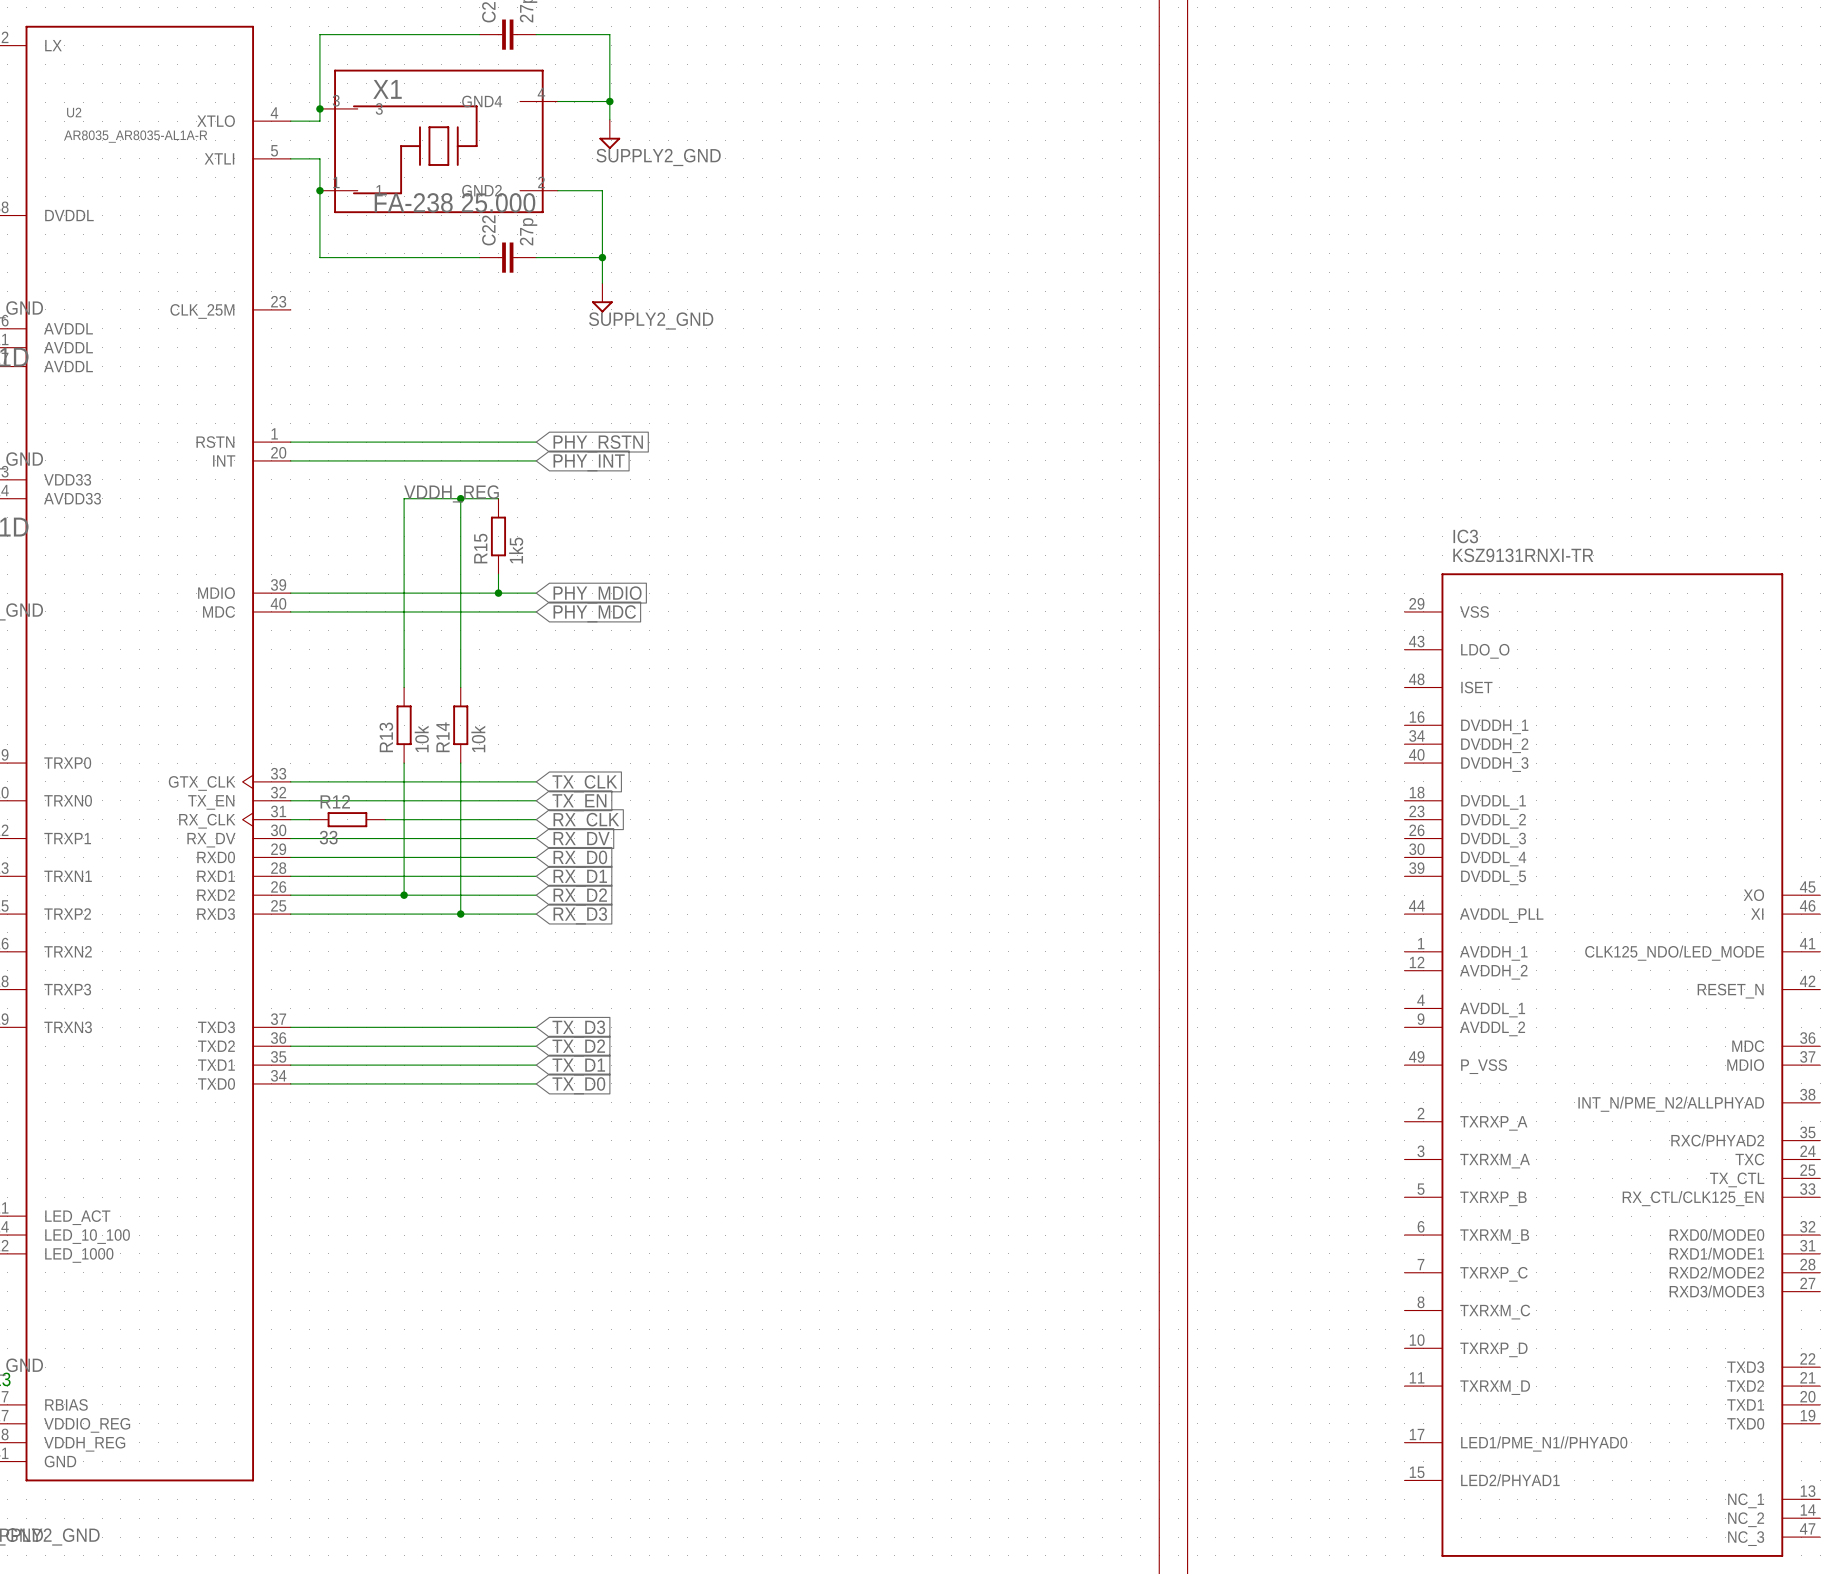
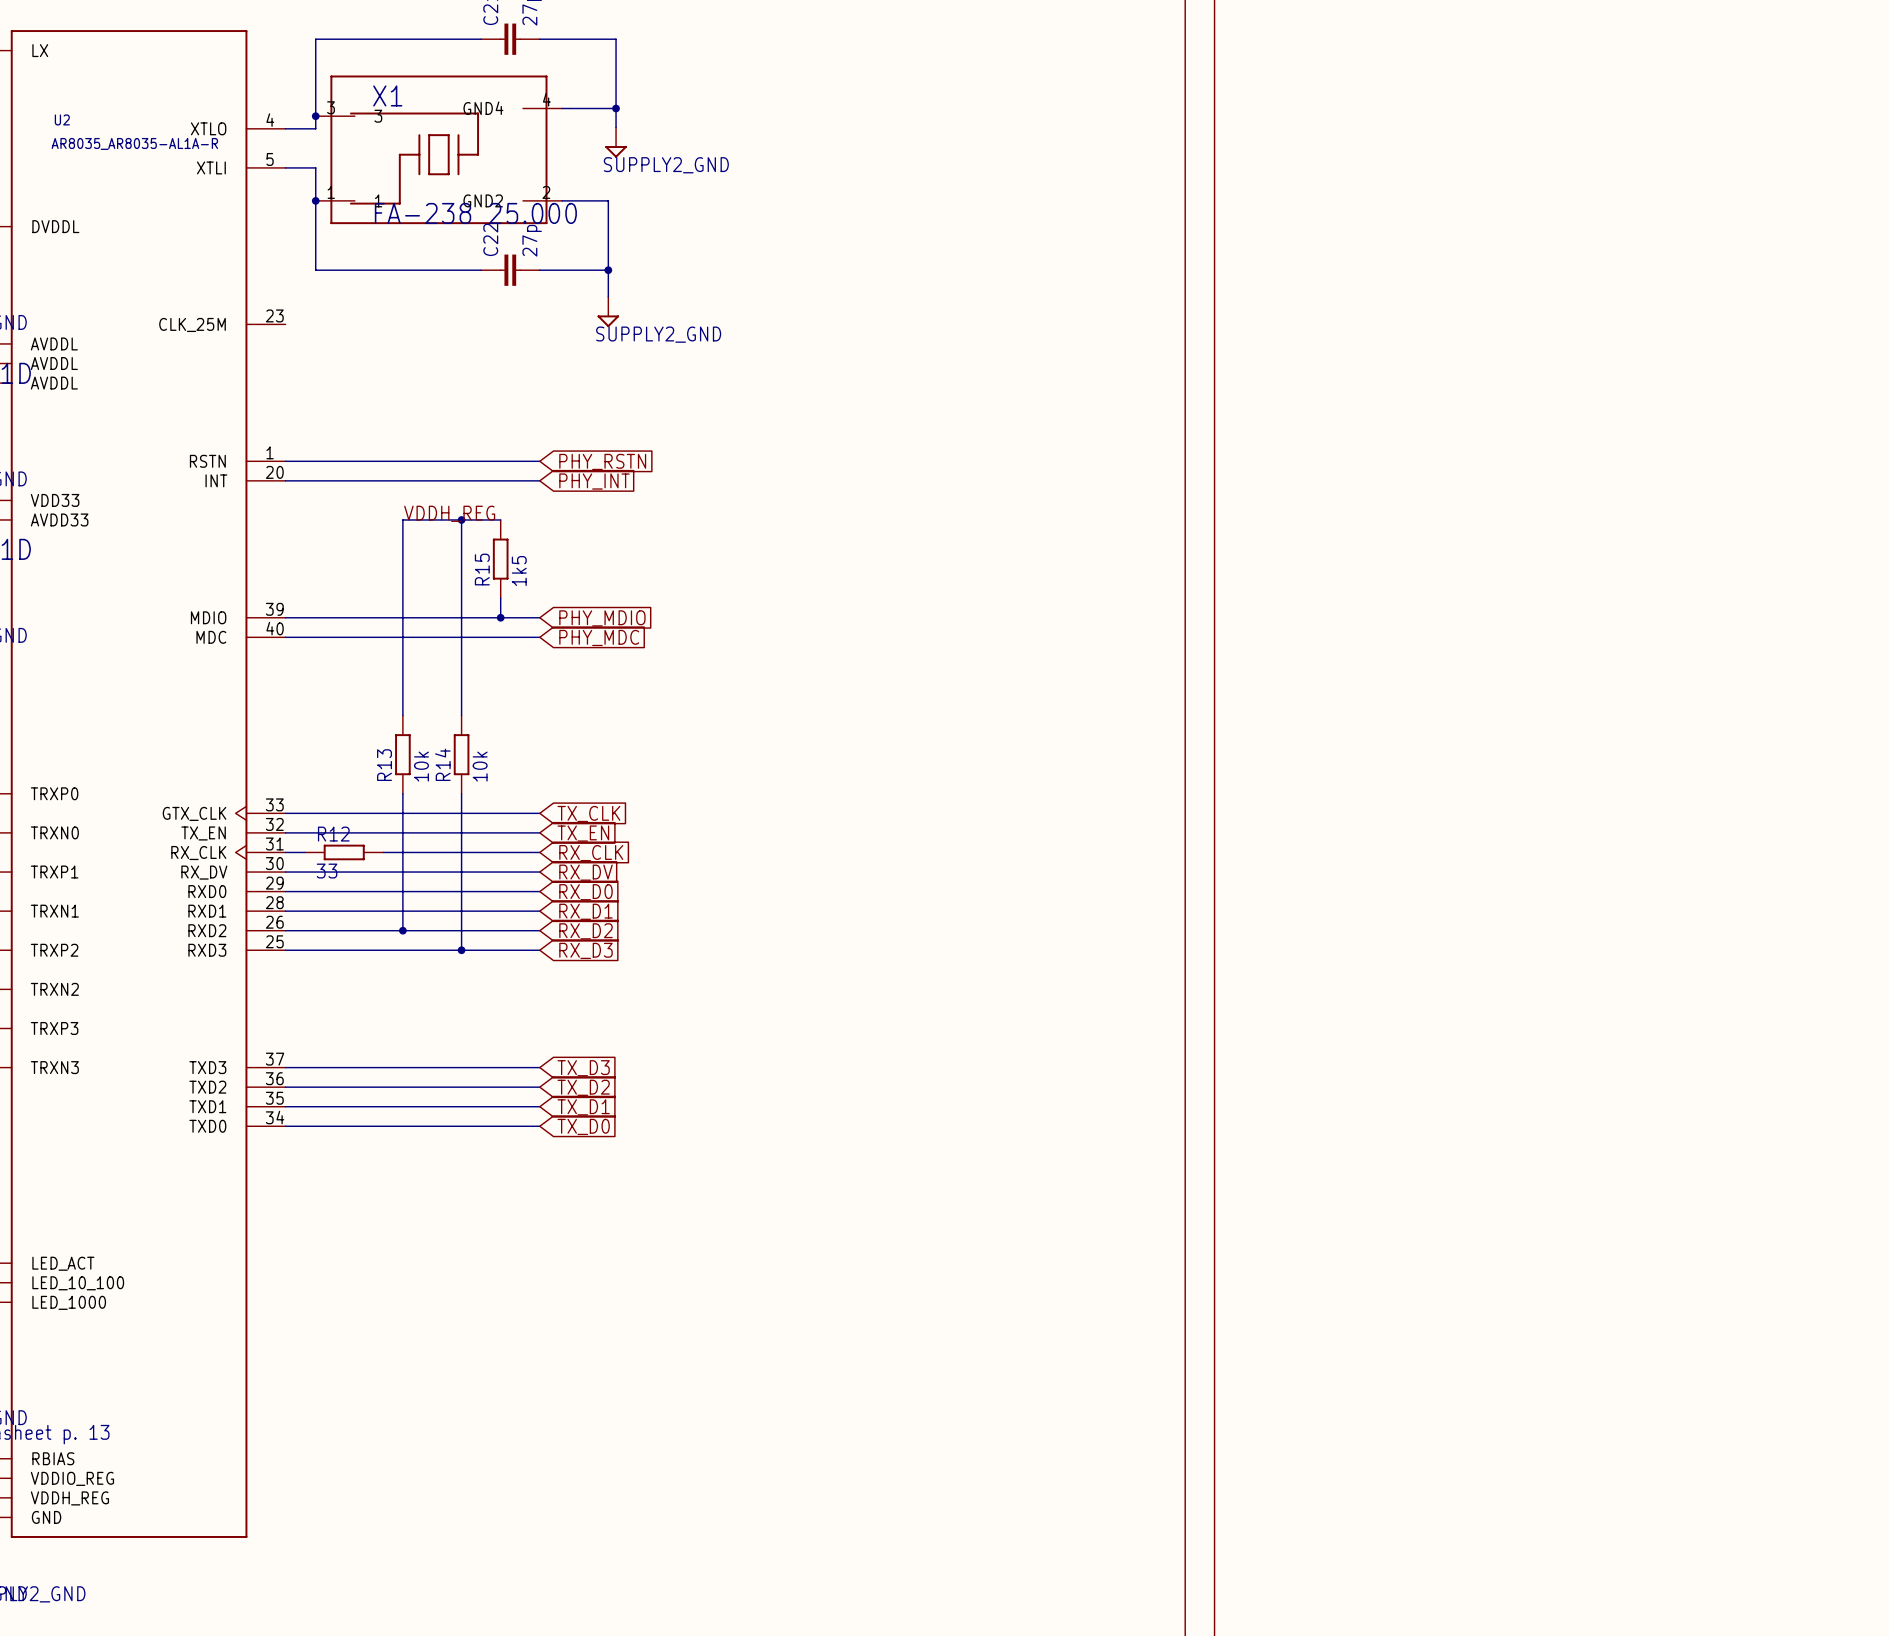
IC3: KSZ9131RNXI-TR (1612, 1065) -> none

